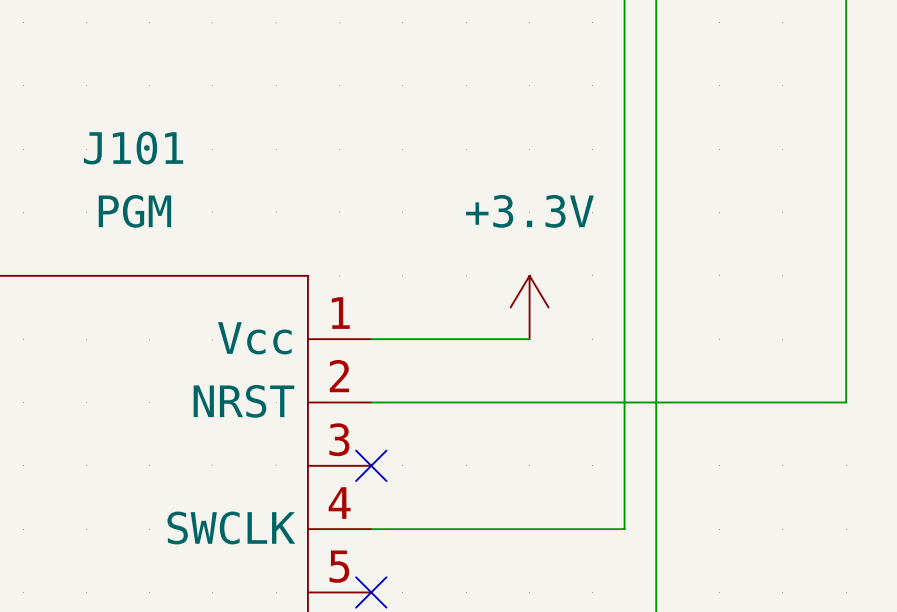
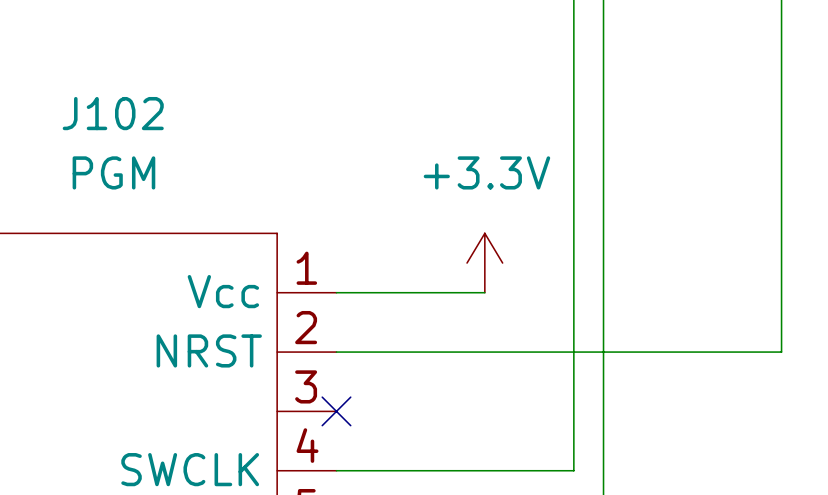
J101 name: J101 (133, 148) -> J102 (113, 113)

